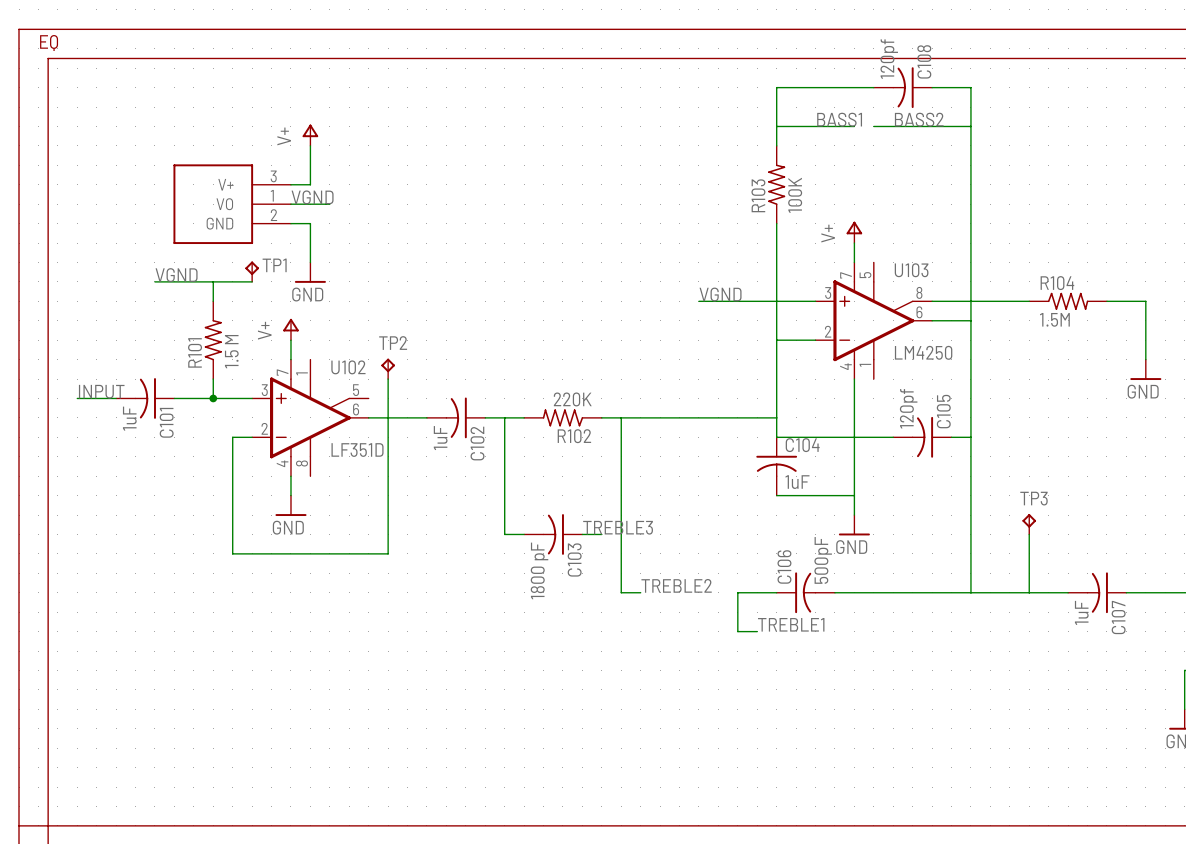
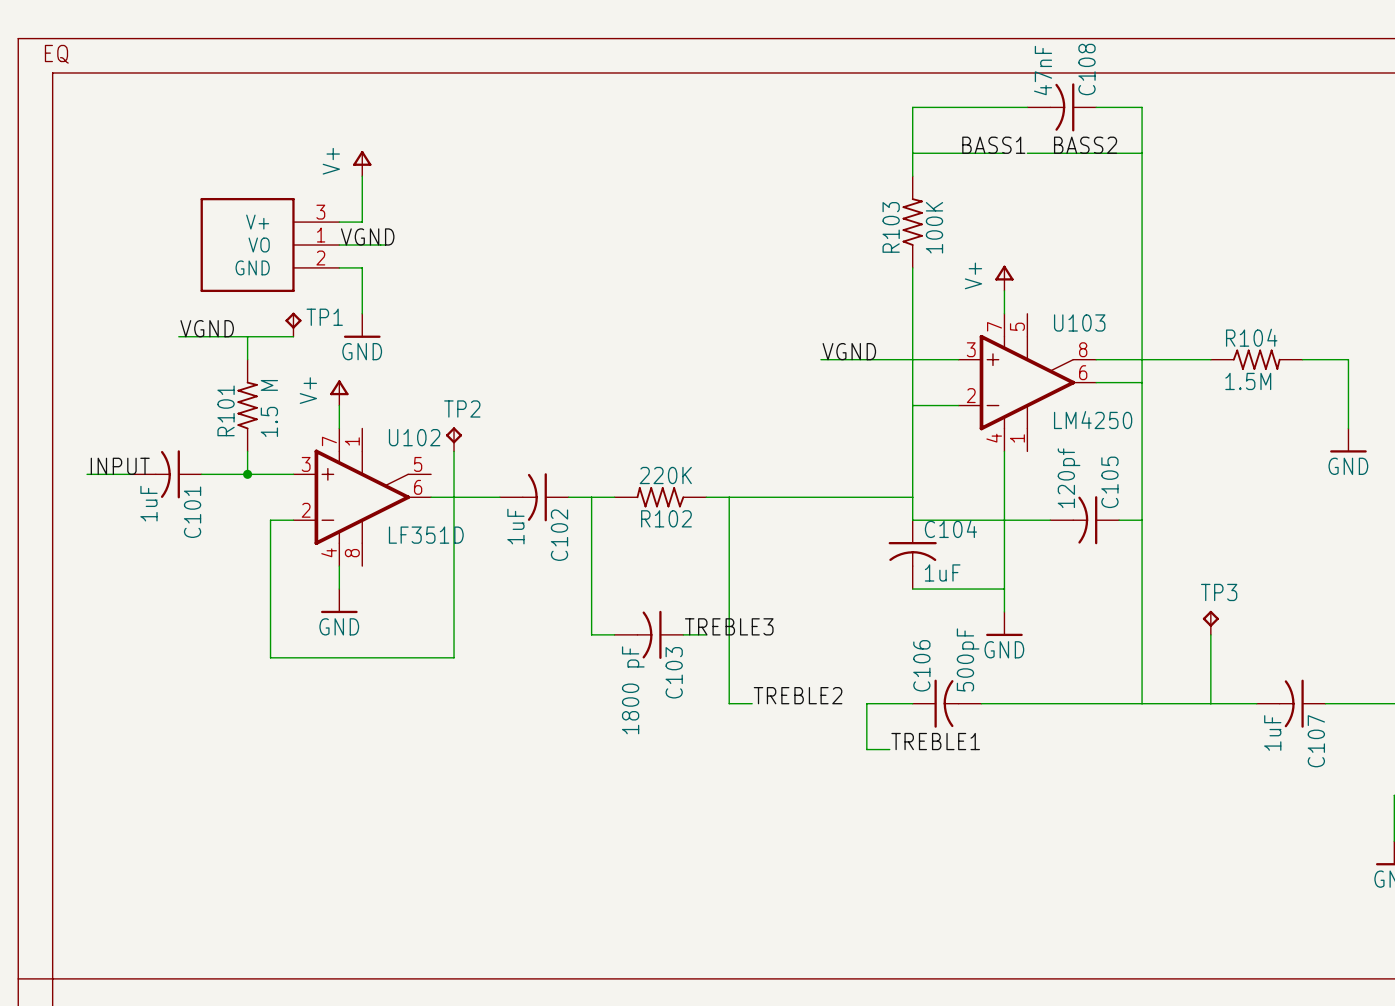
C108 value: 120pf (889, 59) -> 47nF (1043, 70)

